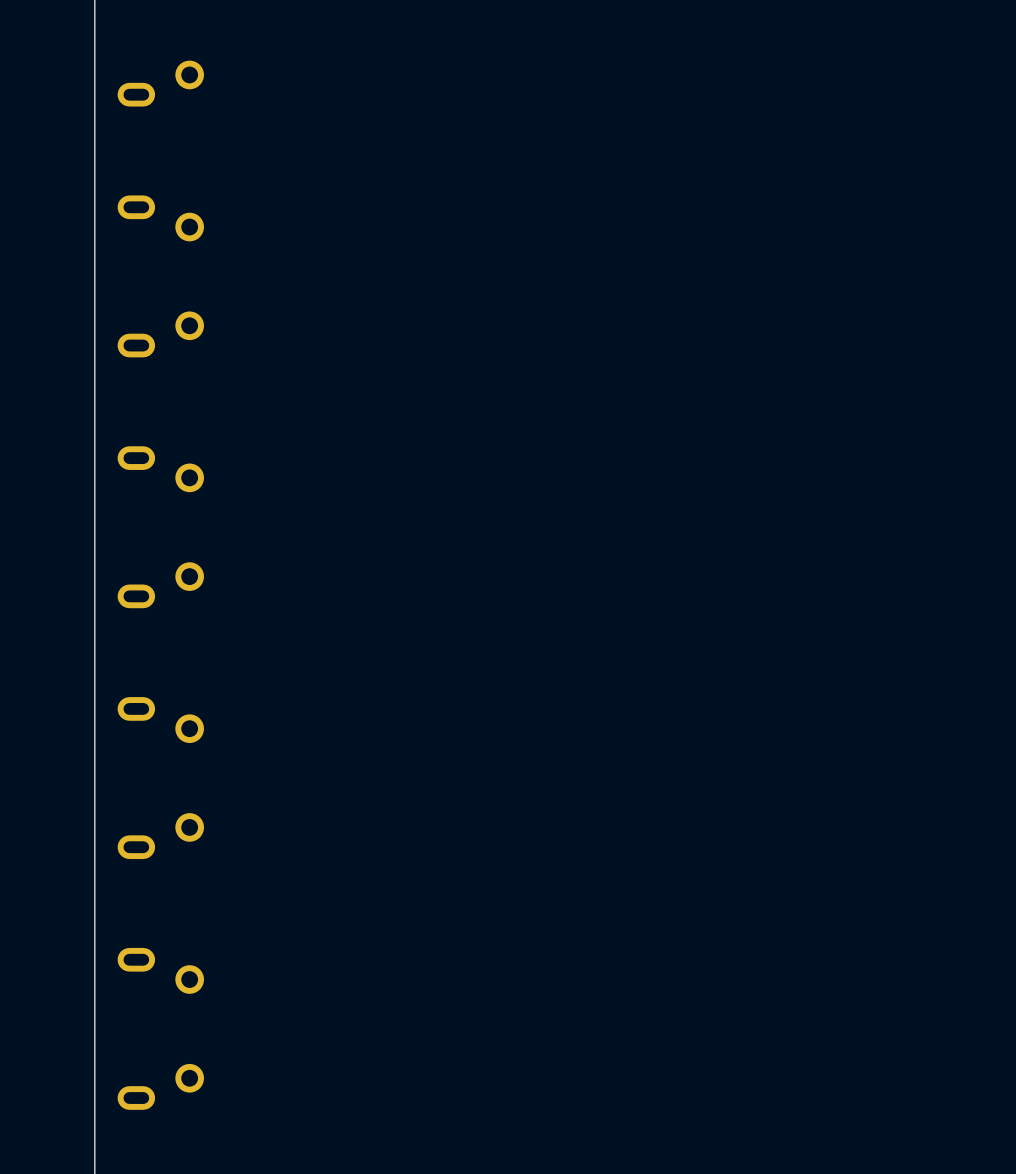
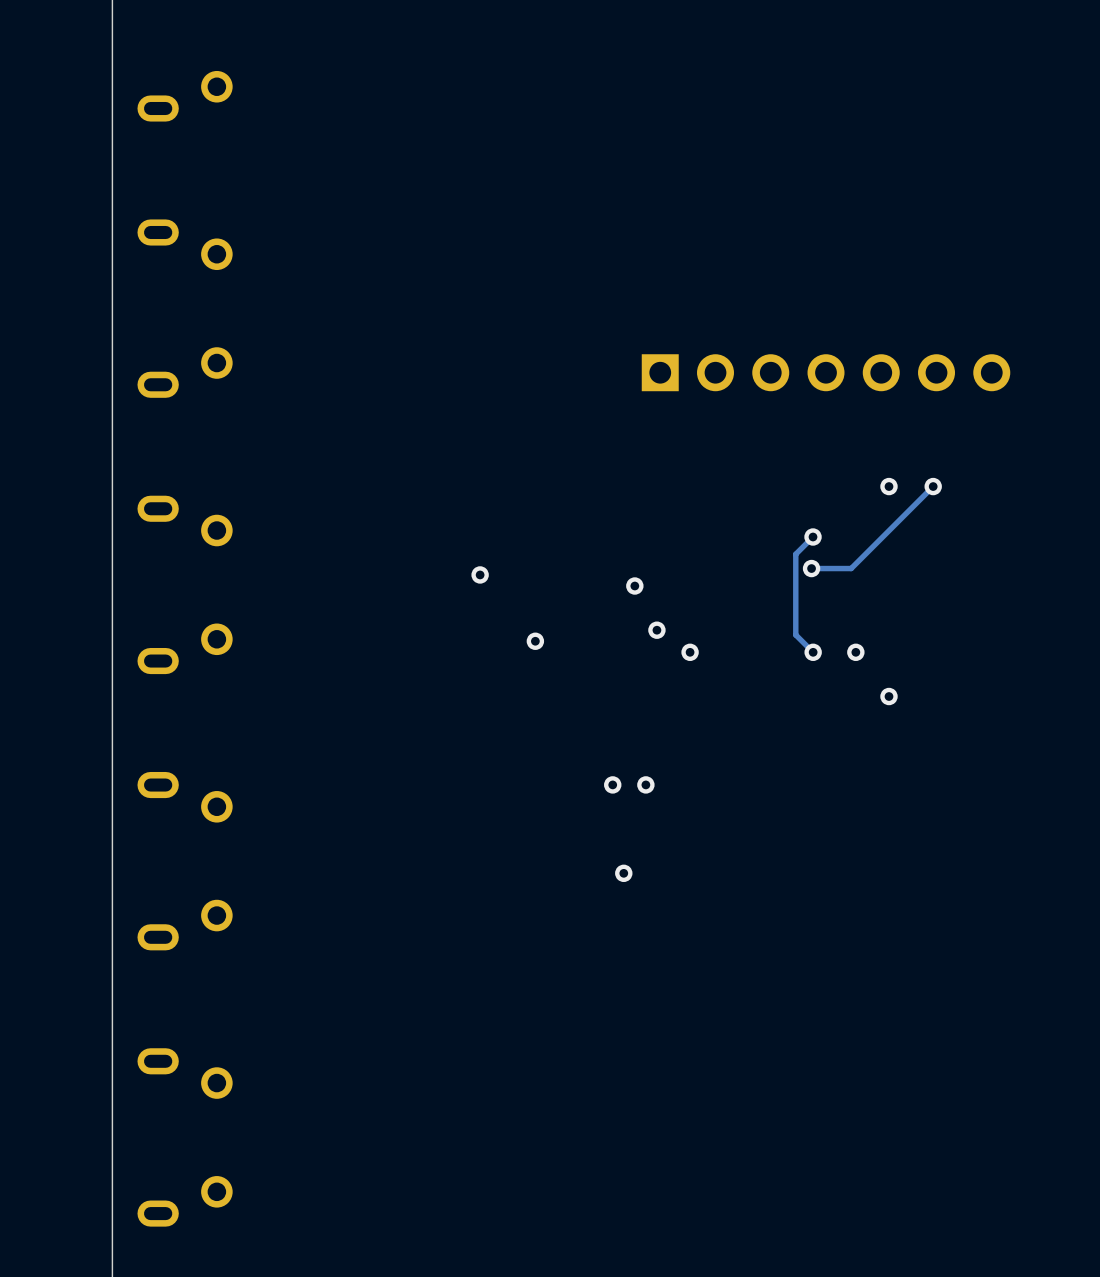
part: none -> (826, 372)
via: none -> (889, 486)
track: none -> (933, 486) (851, 568) (811, 568)
via: none -> (933, 486)
track: none -> (813, 537) (795, 554) (795, 634) (813, 652)
via: none -> (813, 537)
via: none -> (811, 568)
via: none -> (480, 574)
via: none -> (634, 586)
via: none -> (656, 630)
via: none -> (535, 641)
via: none -> (690, 652)
via: none -> (813, 652)
via: none -> (855, 652)
via: none -> (889, 696)
via: none -> (612, 784)
via: none -> (645, 784)
via: none -> (623, 873)

